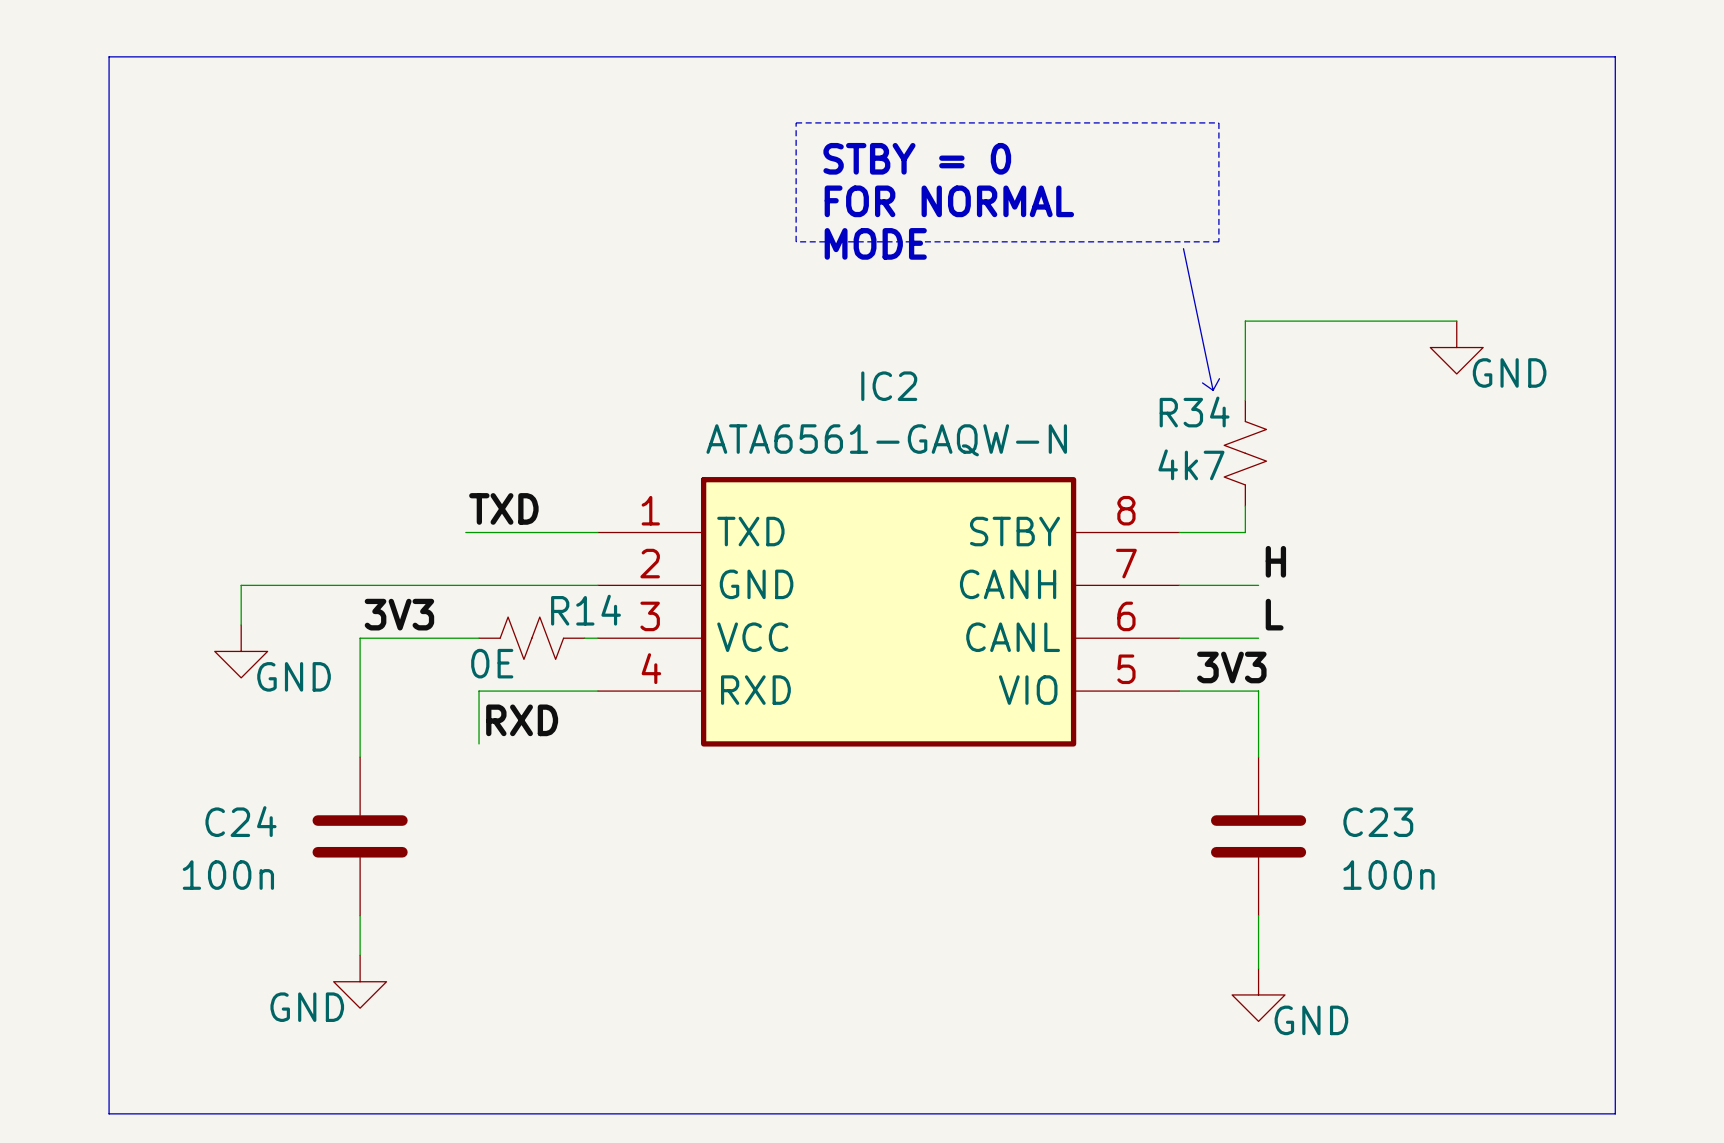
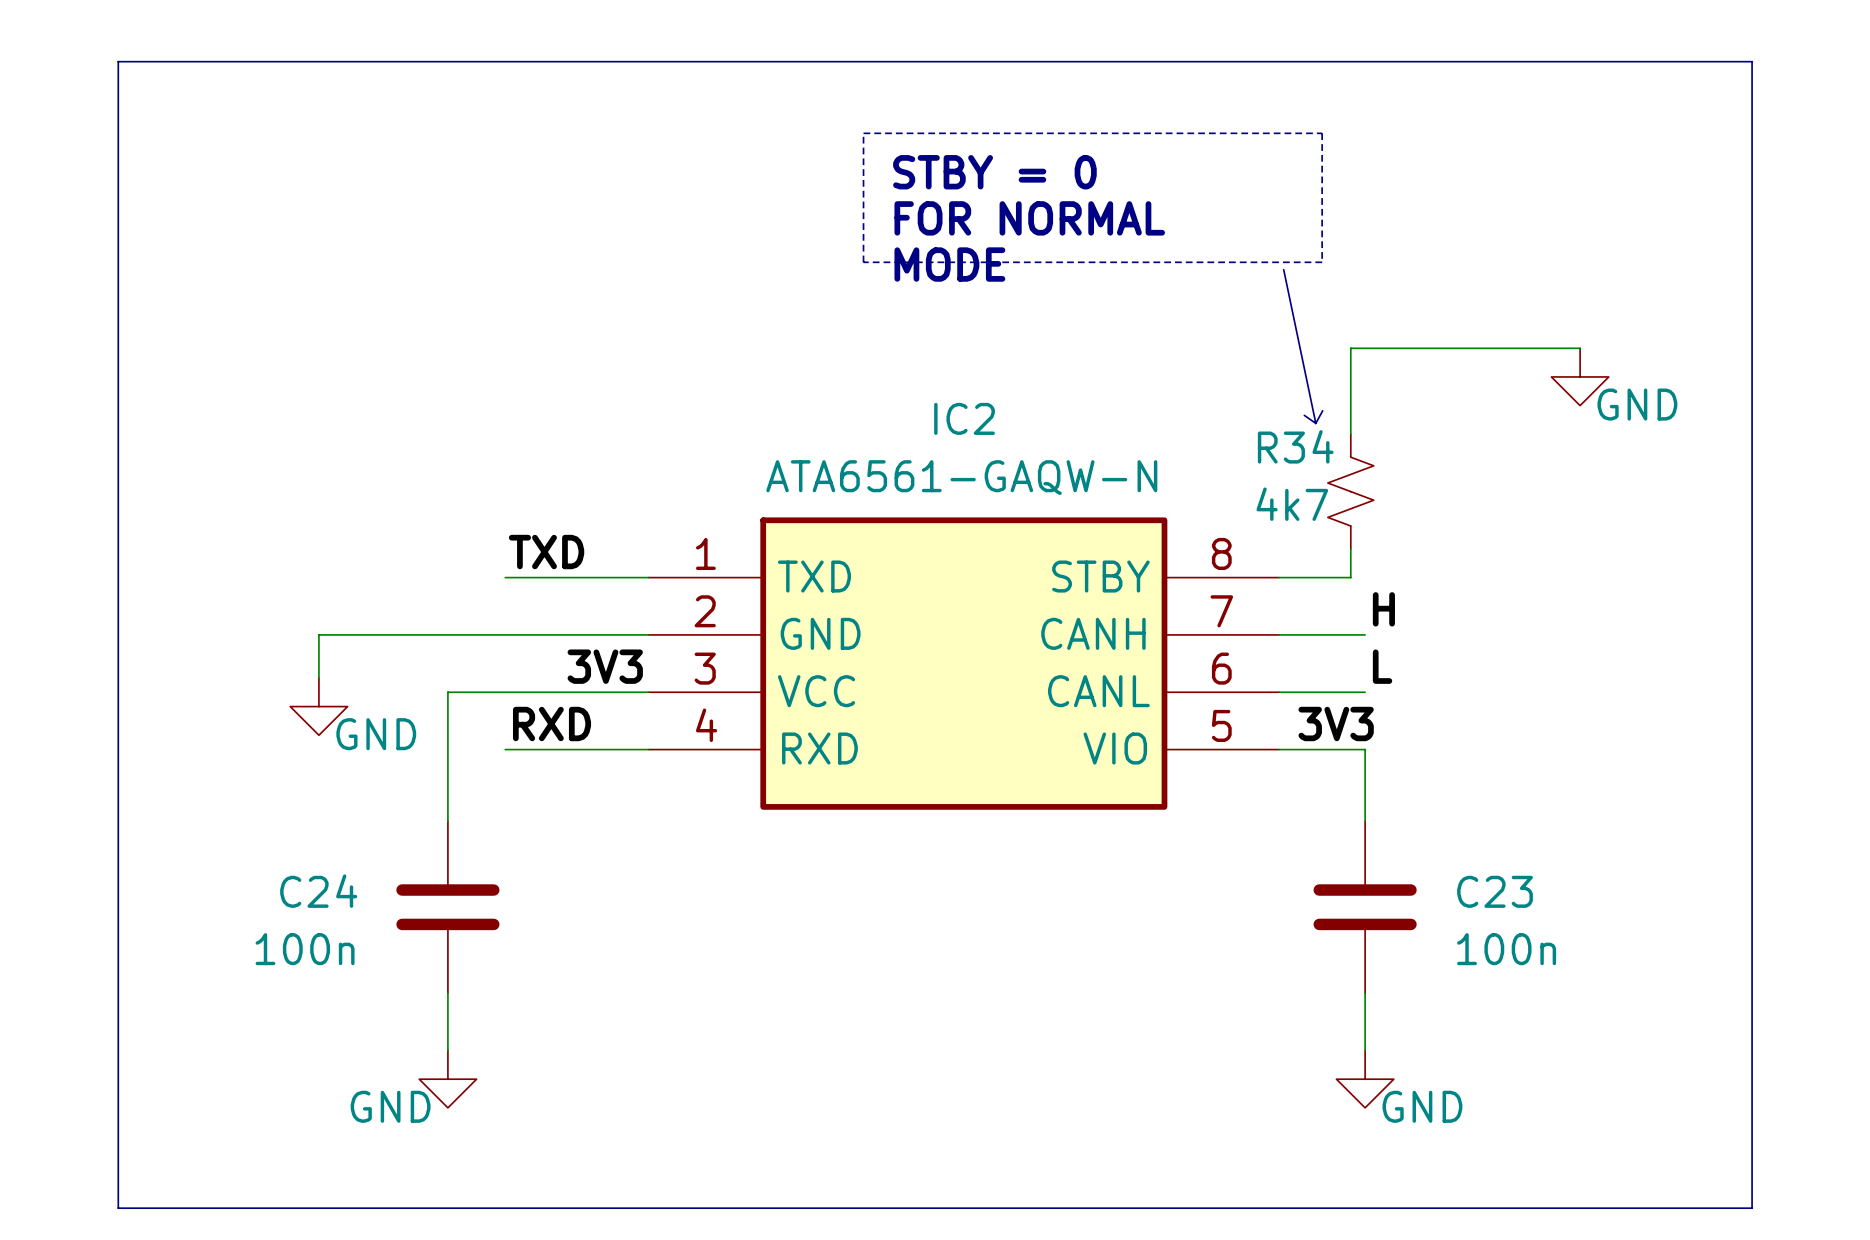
wire: (294, 585) (241, 585) (241, 625) -> (318, 634) (318, 677)
label position: 3V3 (399, 614) -> 3V3 (605, 666)
wire: (412, 638) (360, 638) (360, 757) -> (447, 692) (447, 821)
wire: none -> (519, 692) (634, 692)
R14: 0E (531, 638) -> none
power symbol position: GND (241, 651) -> GND (318, 706)
wire: (479, 691) (479, 743) -> (519, 749) (505, 749)
label position: RXD (522, 720) -> RXD (552, 724)
C24 position: (360, 836) -> (447, 907)
wire: (360, 915) (360, 955) -> none
wire: none -> (447, 993) (447, 1050)
power symbol position: GND (360, 981) -> GND (447, 1079)

